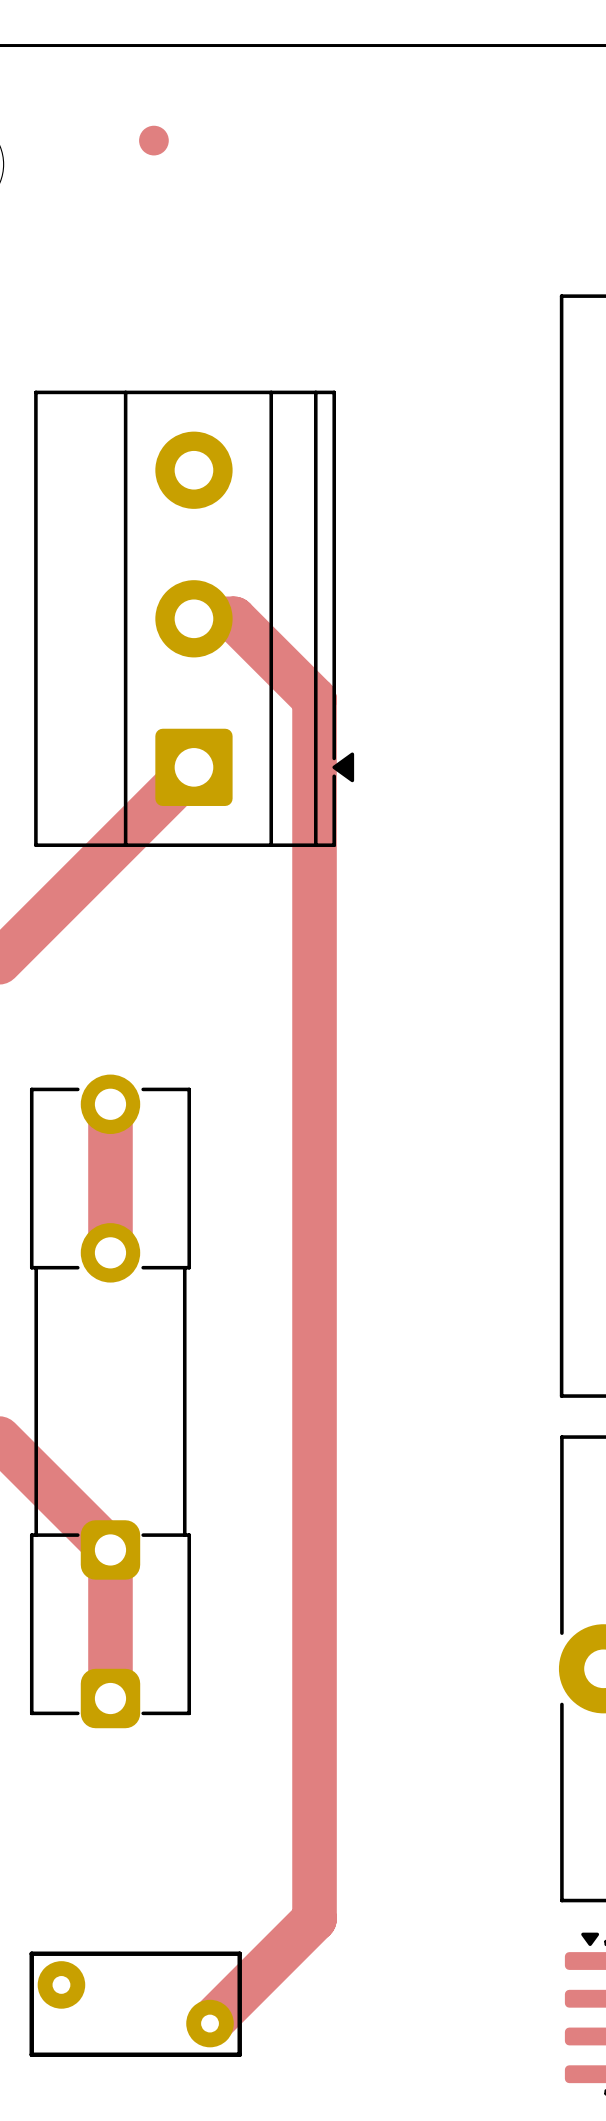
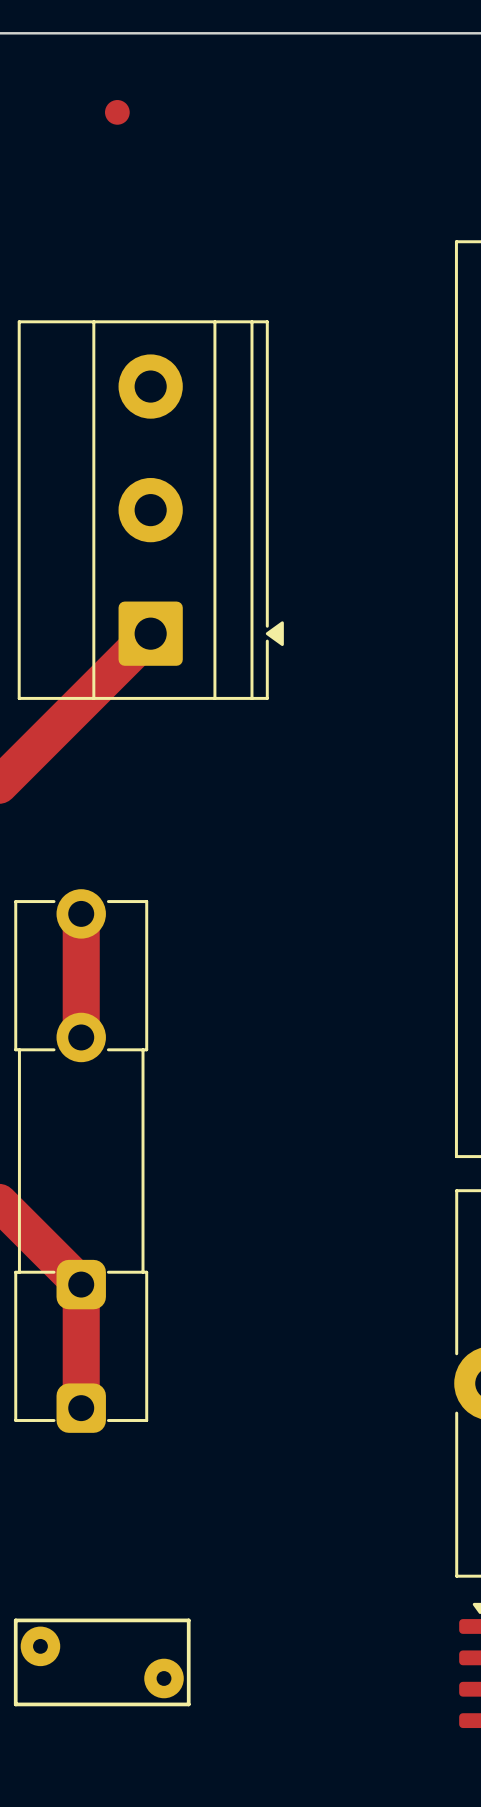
track: (193, 618) (234, 618) (314, 699) (314, 1919) (210, 2023) -> none

